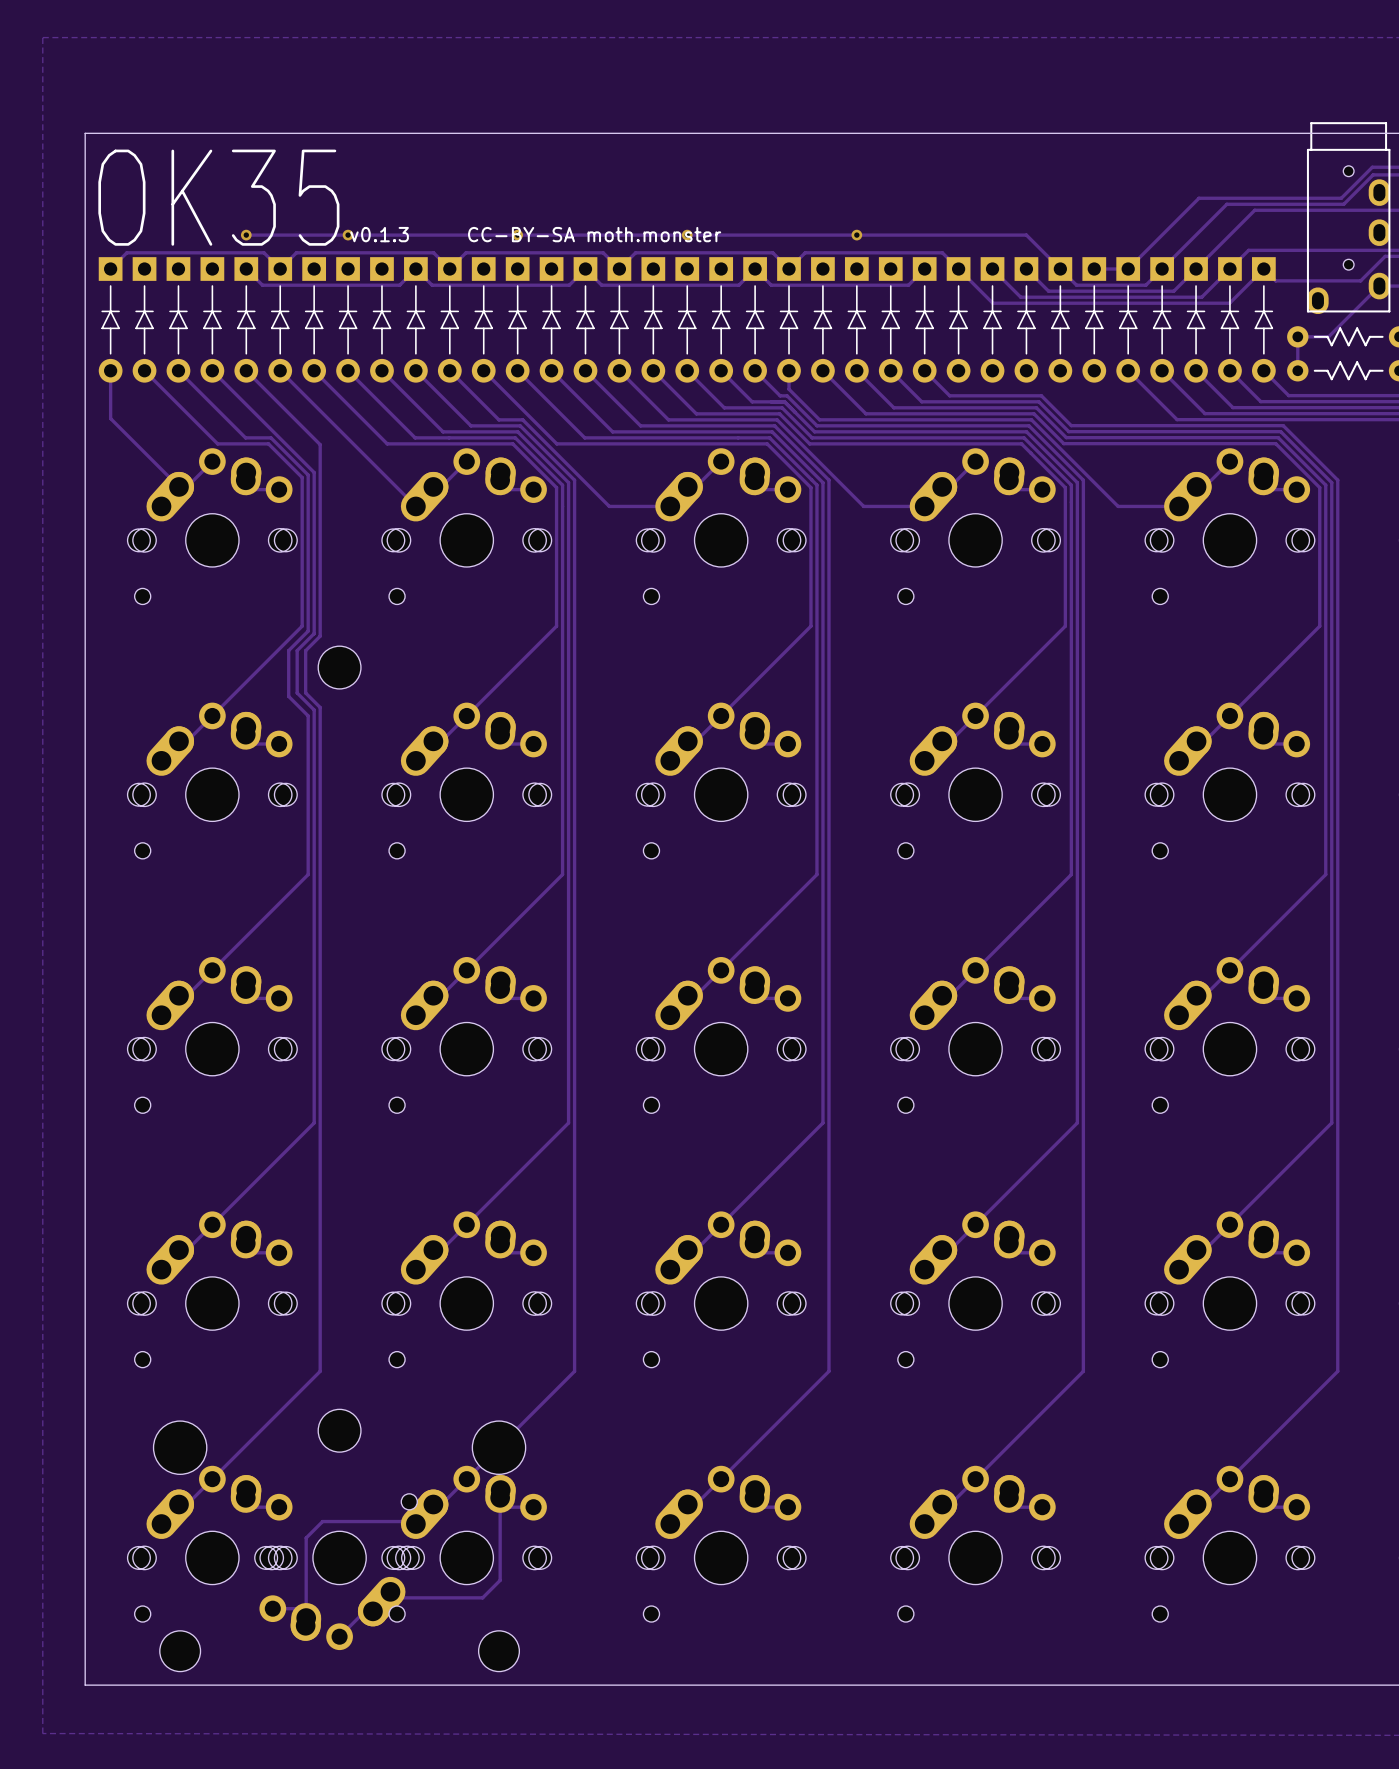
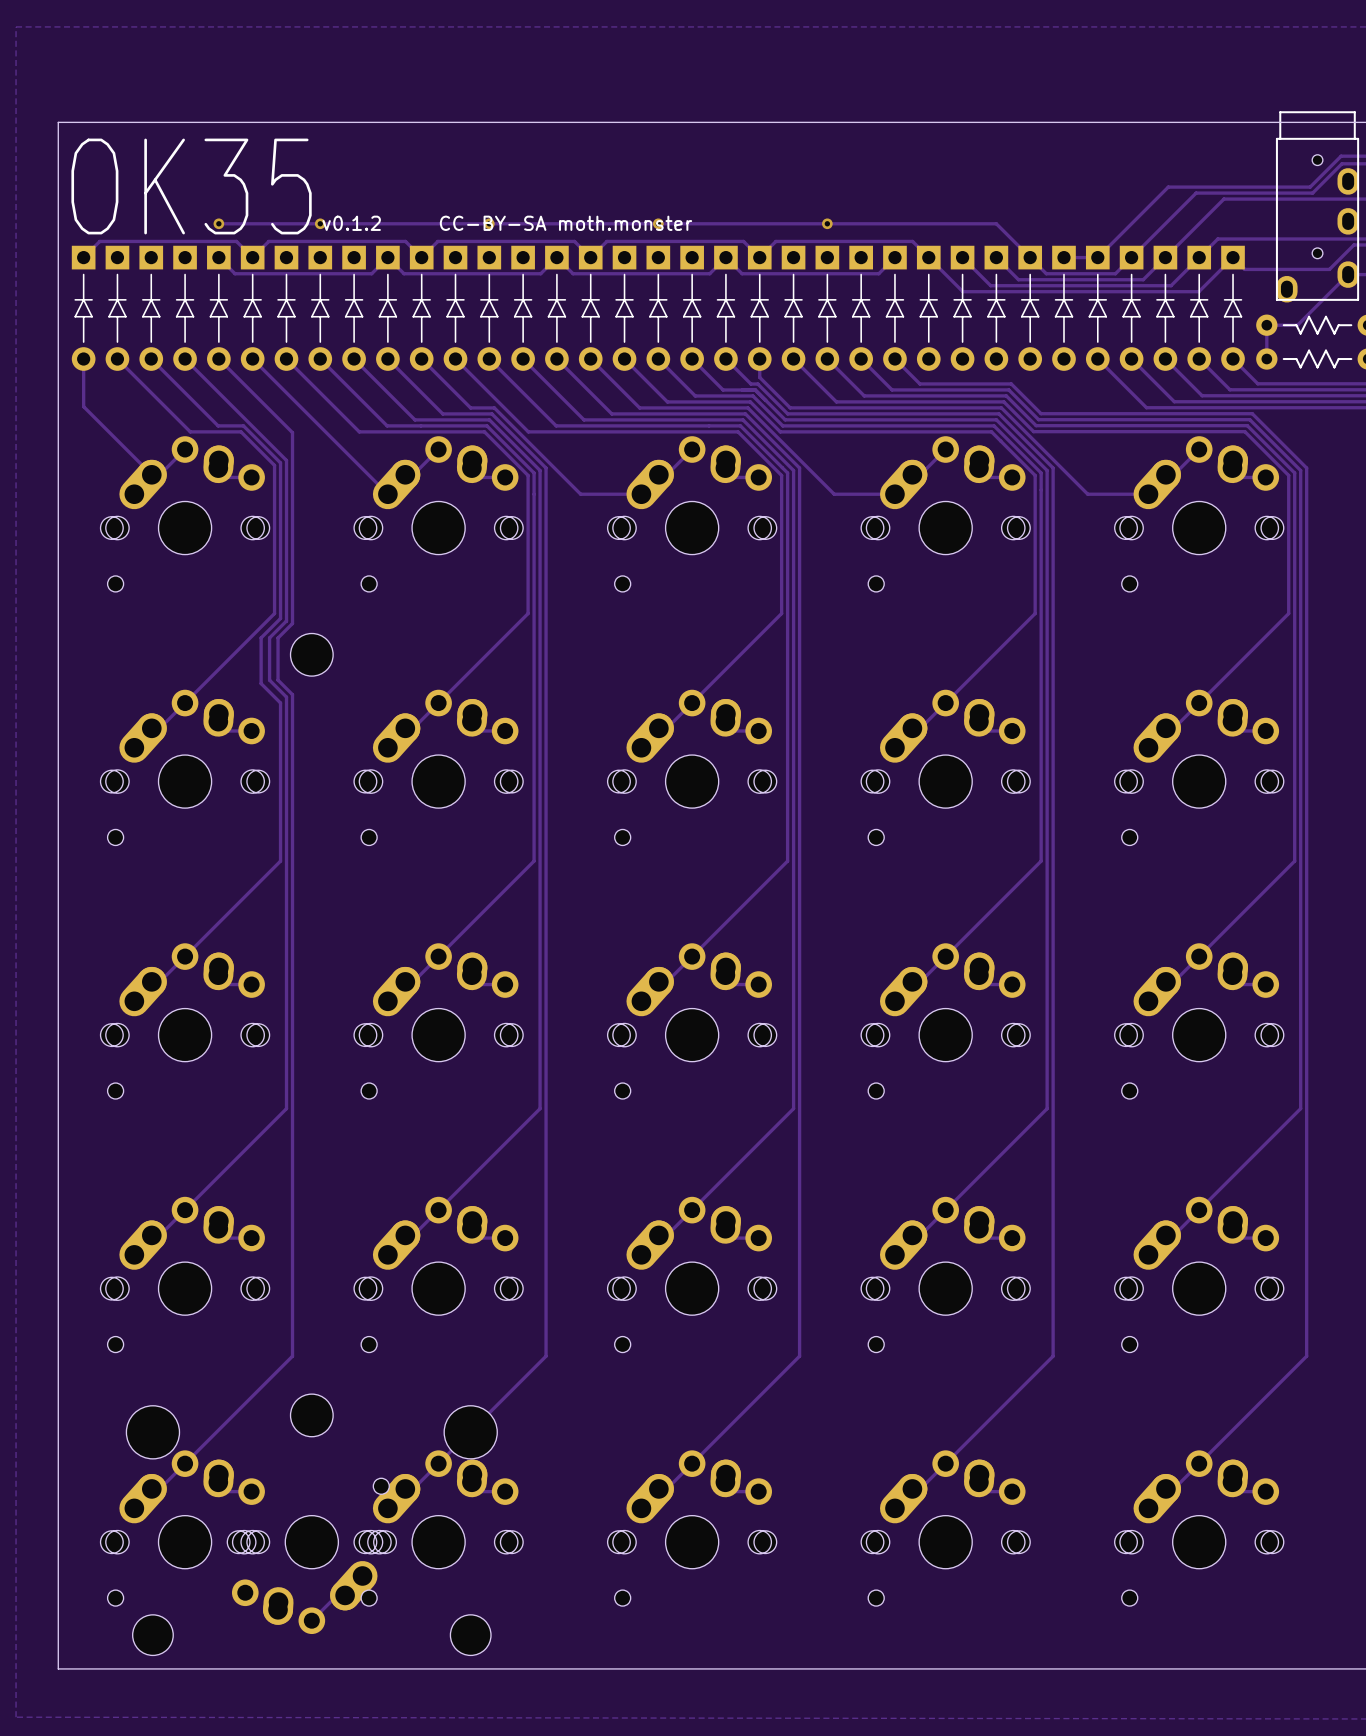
text: v0.1.3 (379, 234) -> v0.1.2 (351, 223)
track: (500, 1497) (500, 1580) (482, 1597) (396, 1597) (390, 1591) -> none
track: (415, 1524) (413, 1521) (322, 1521) (306, 1537) (306, 1618) (296, 1608) (272, 1608) -> none

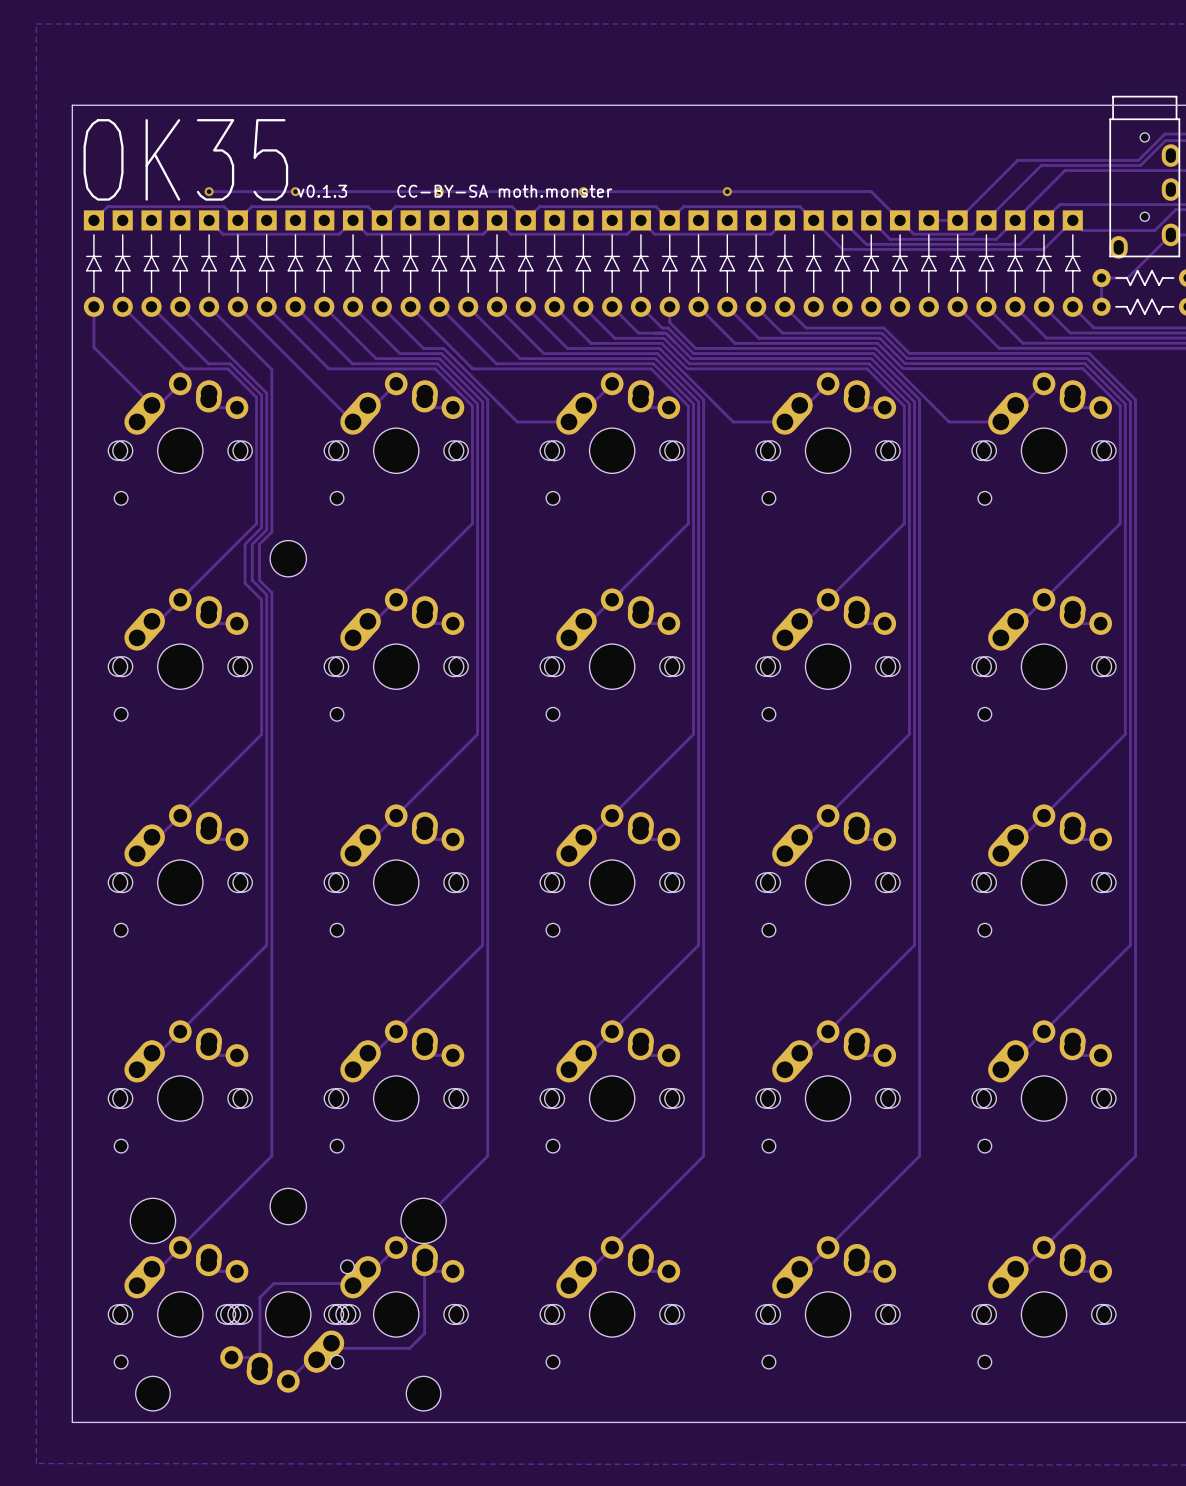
text: v0.1.2 (351, 223) -> v0.1.3 (322, 191)
track: none -> (424, 1263) (424, 1333) (409, 1348) (336, 1348) (331, 1343)
track: none -> (353, 1285) (350, 1283) (273, 1283) (259, 1297) (259, 1365) (252, 1357) (231, 1357)

